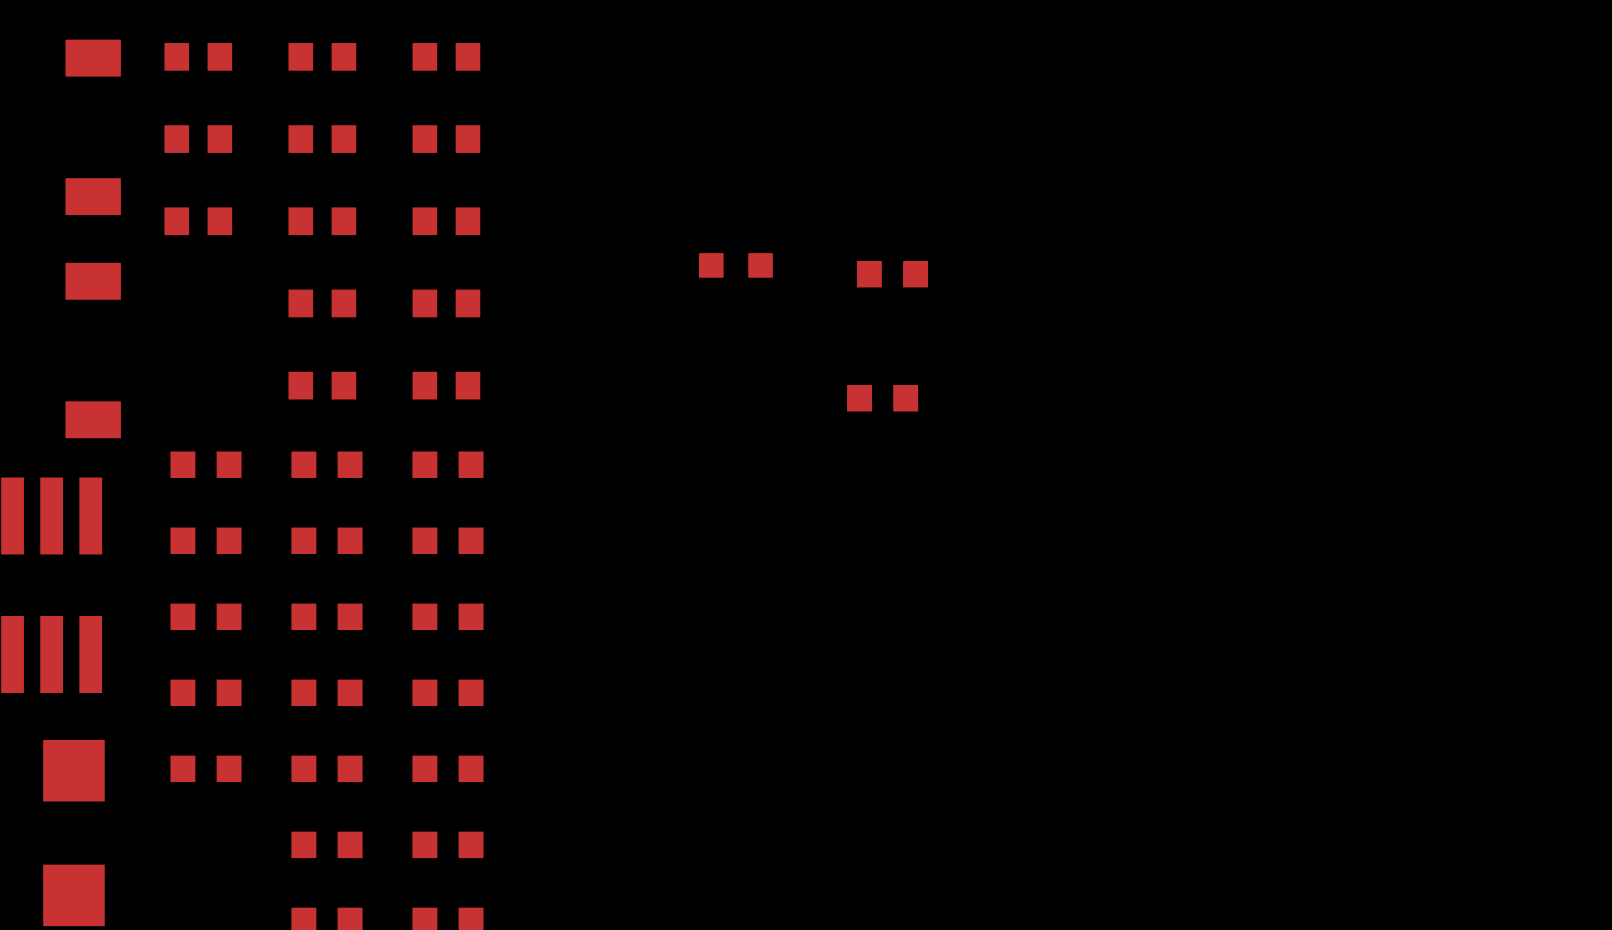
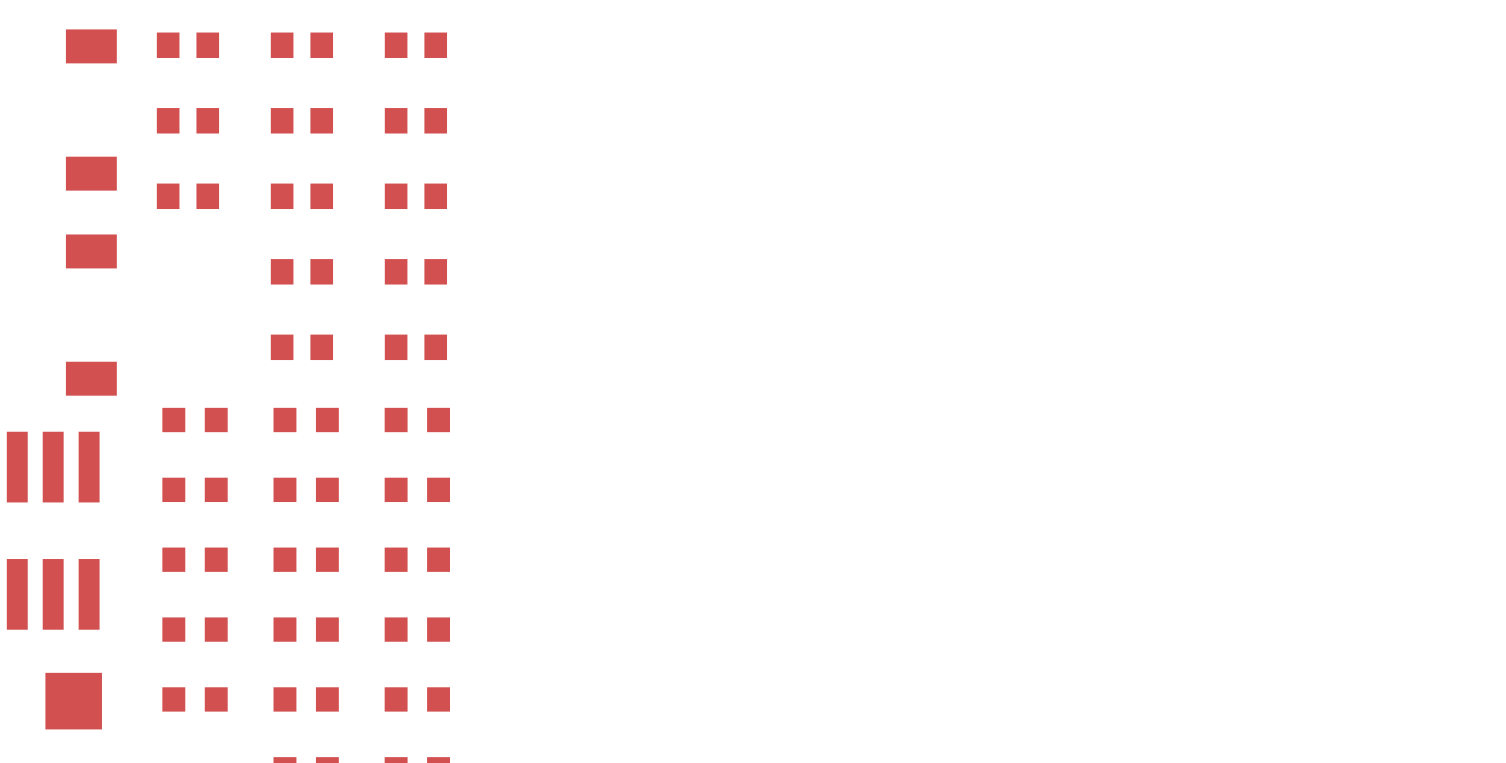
part: (735, 265) -> none
part: (892, 274) -> none
part: (882, 398) -> none

